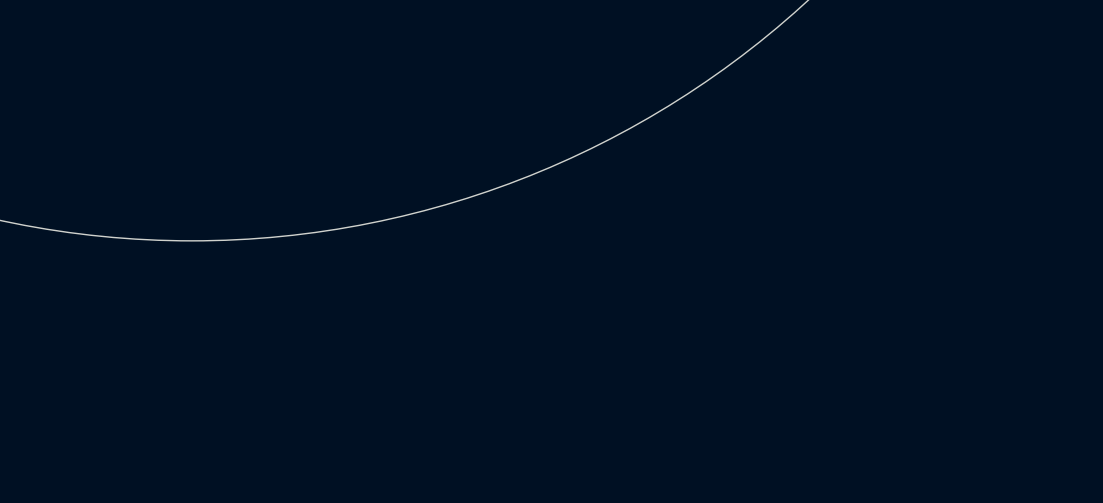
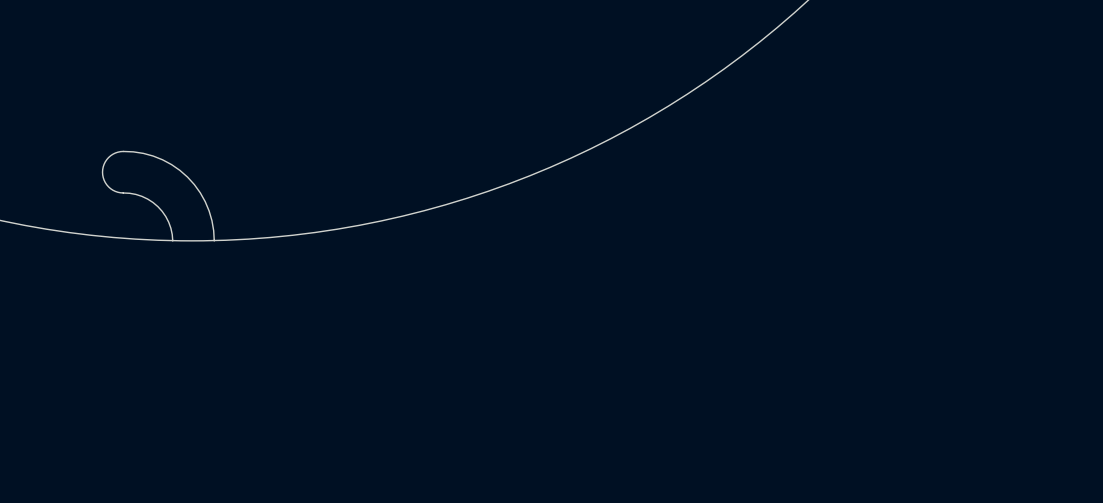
board edge: none -> (214, 240) (211, 220) (205, 201) (194, 184) (179, 170) (162, 159) (143, 153) (120, 151) (110, 155) (105, 161) (102, 169) (103, 177) (106, 184) (117, 192) (141, 196) (157, 206) (168, 222) (172, 240)

